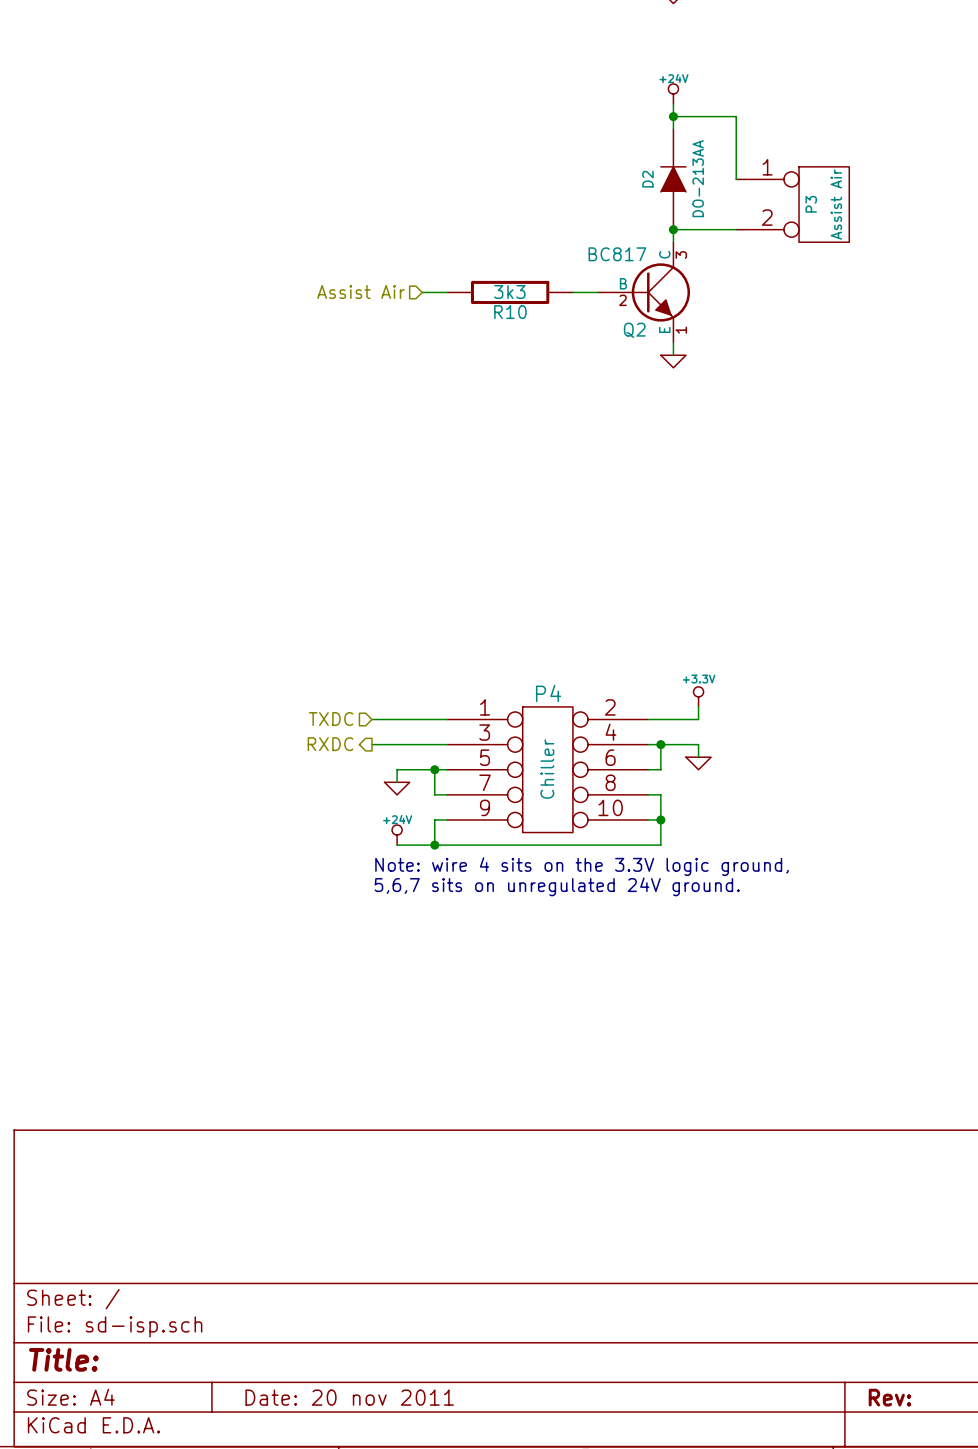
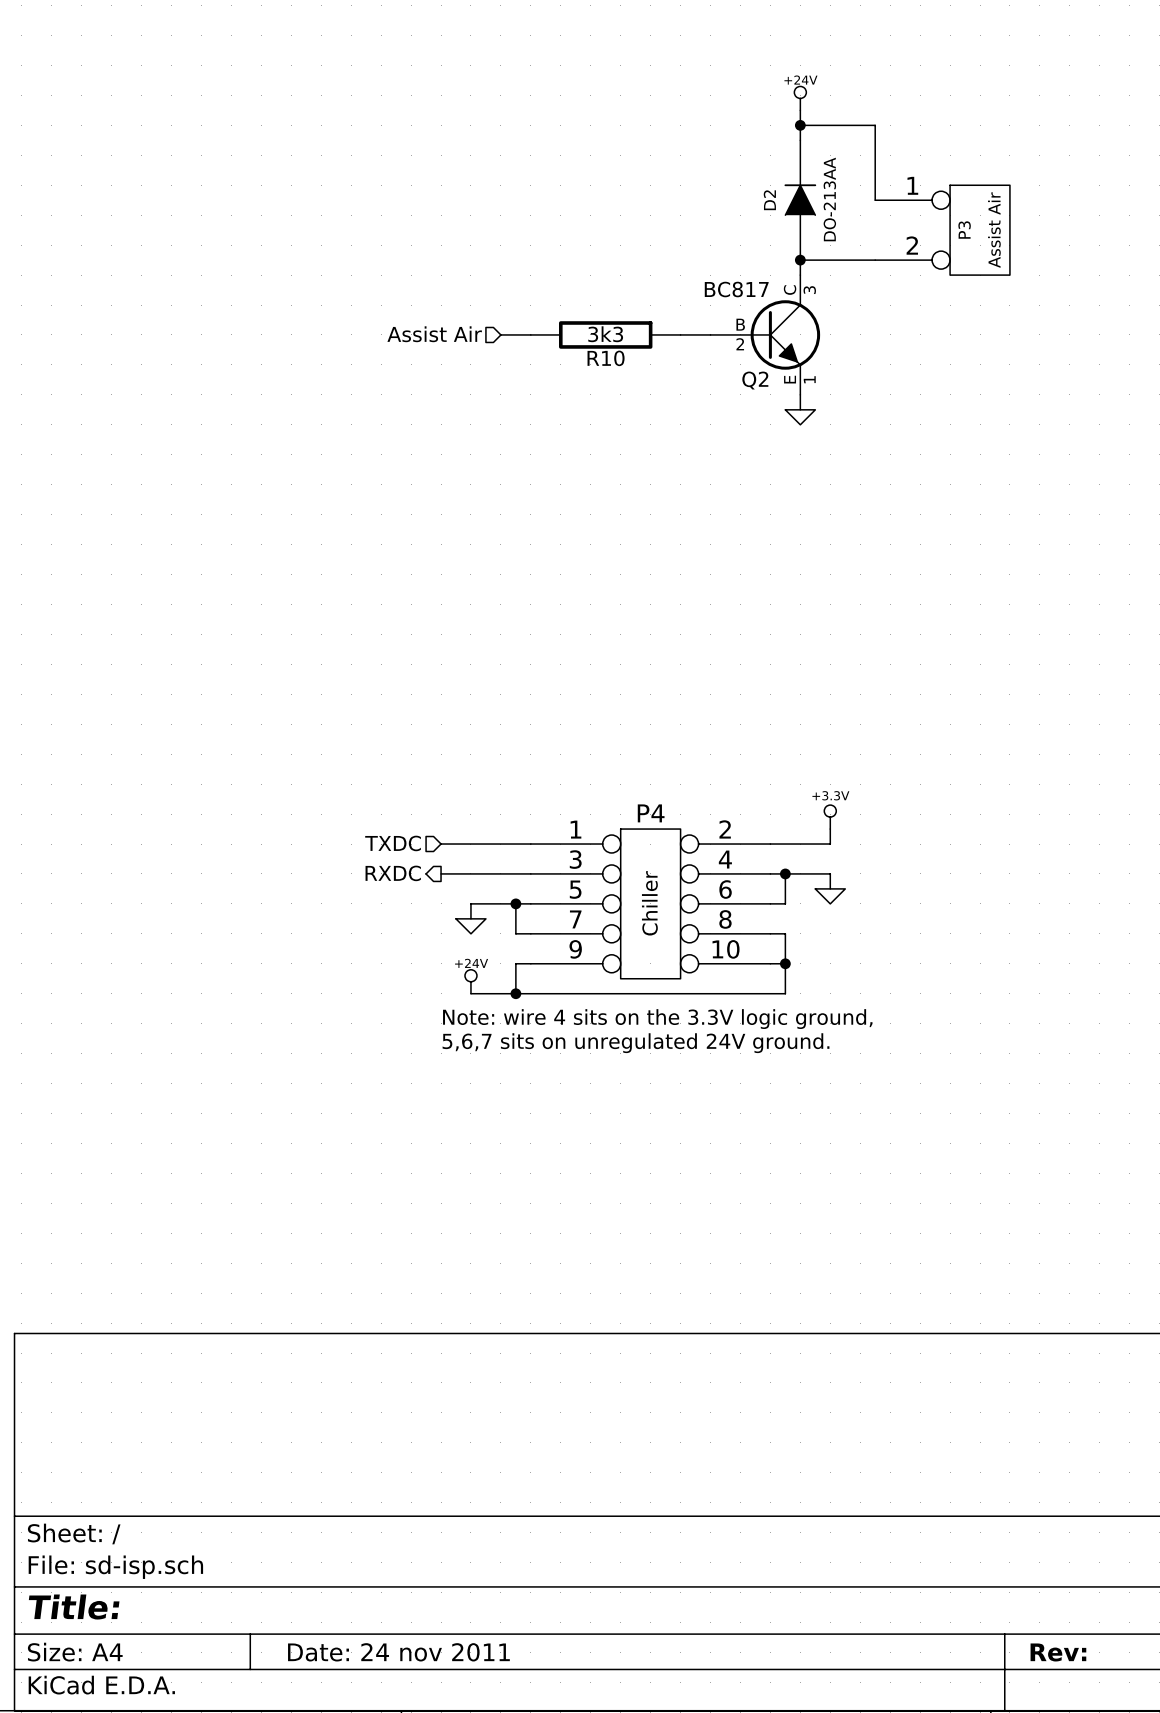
title block: Date: 20 nov 2011 (349, 1397) -> Date: 24 nov 2011 (398, 1652)

